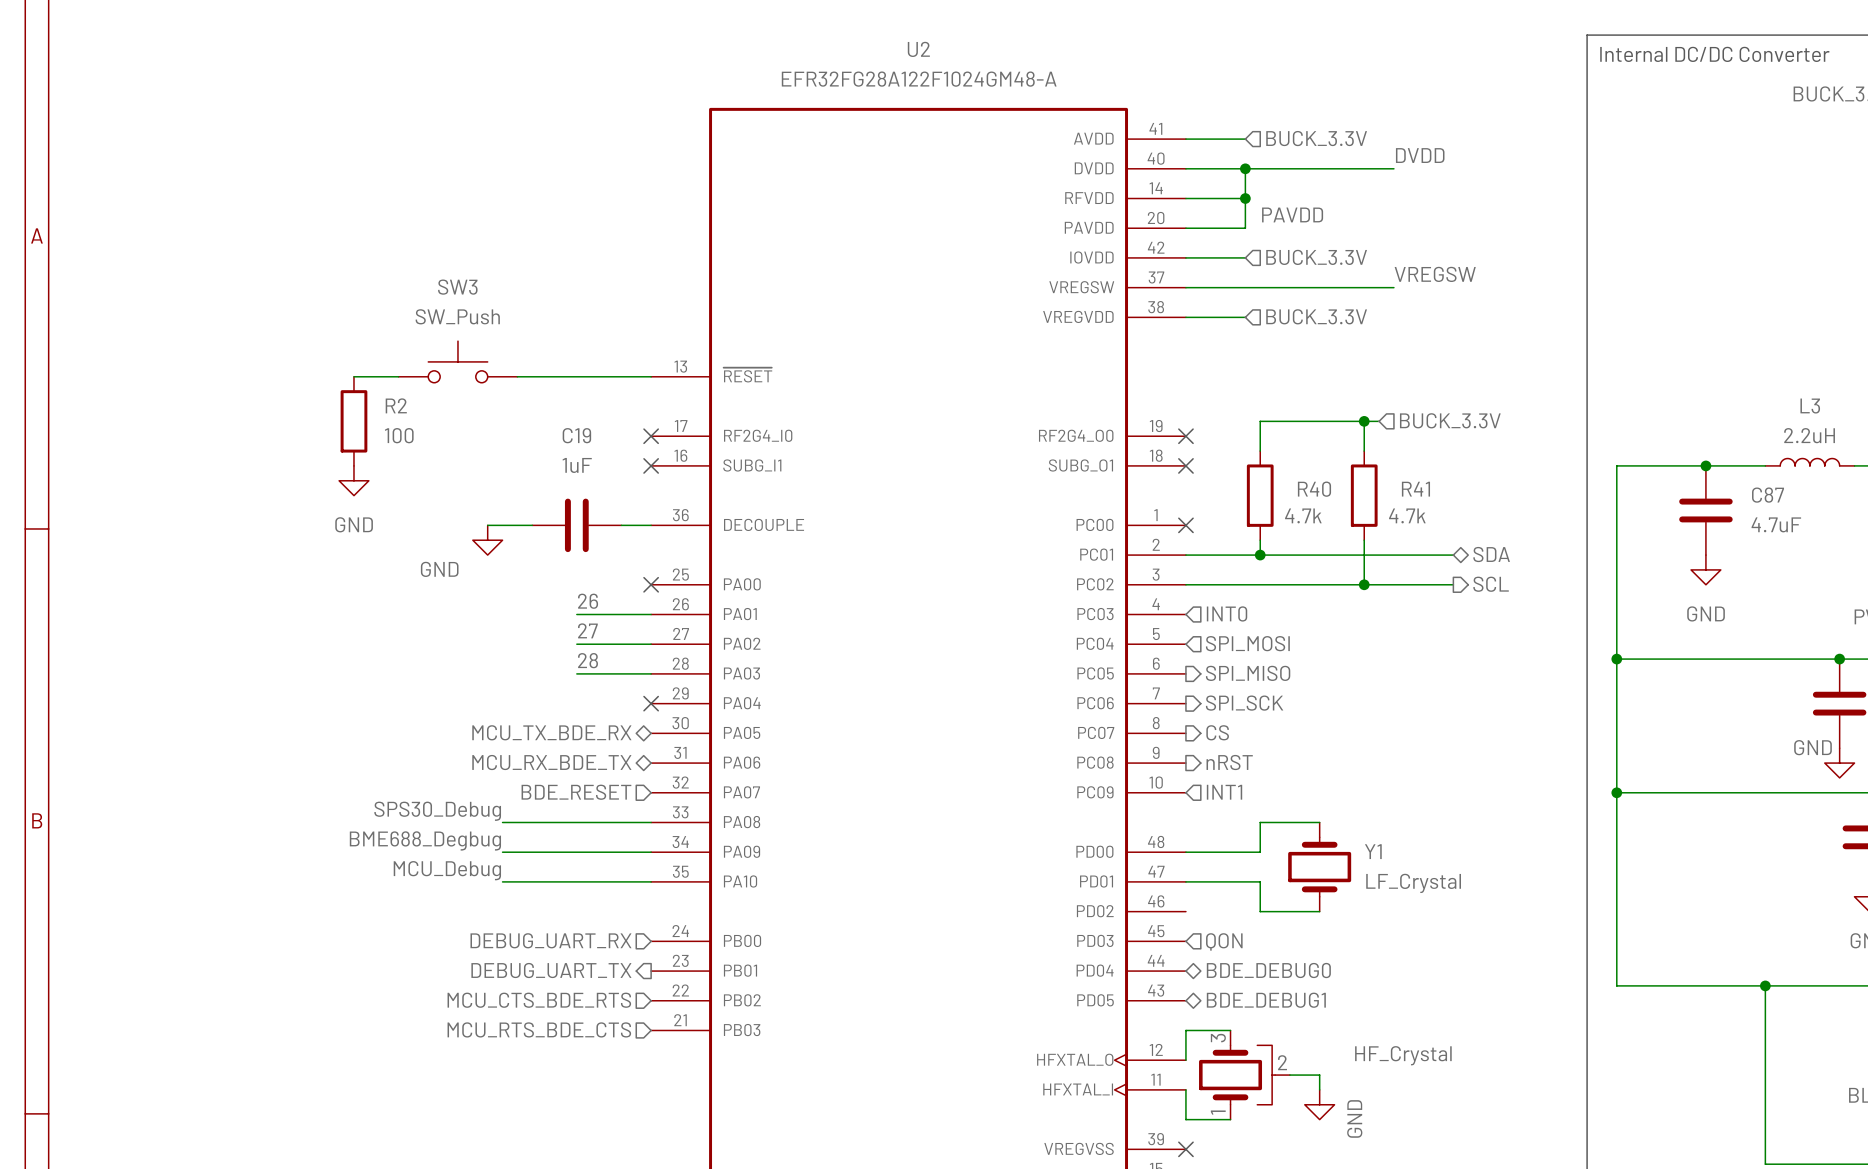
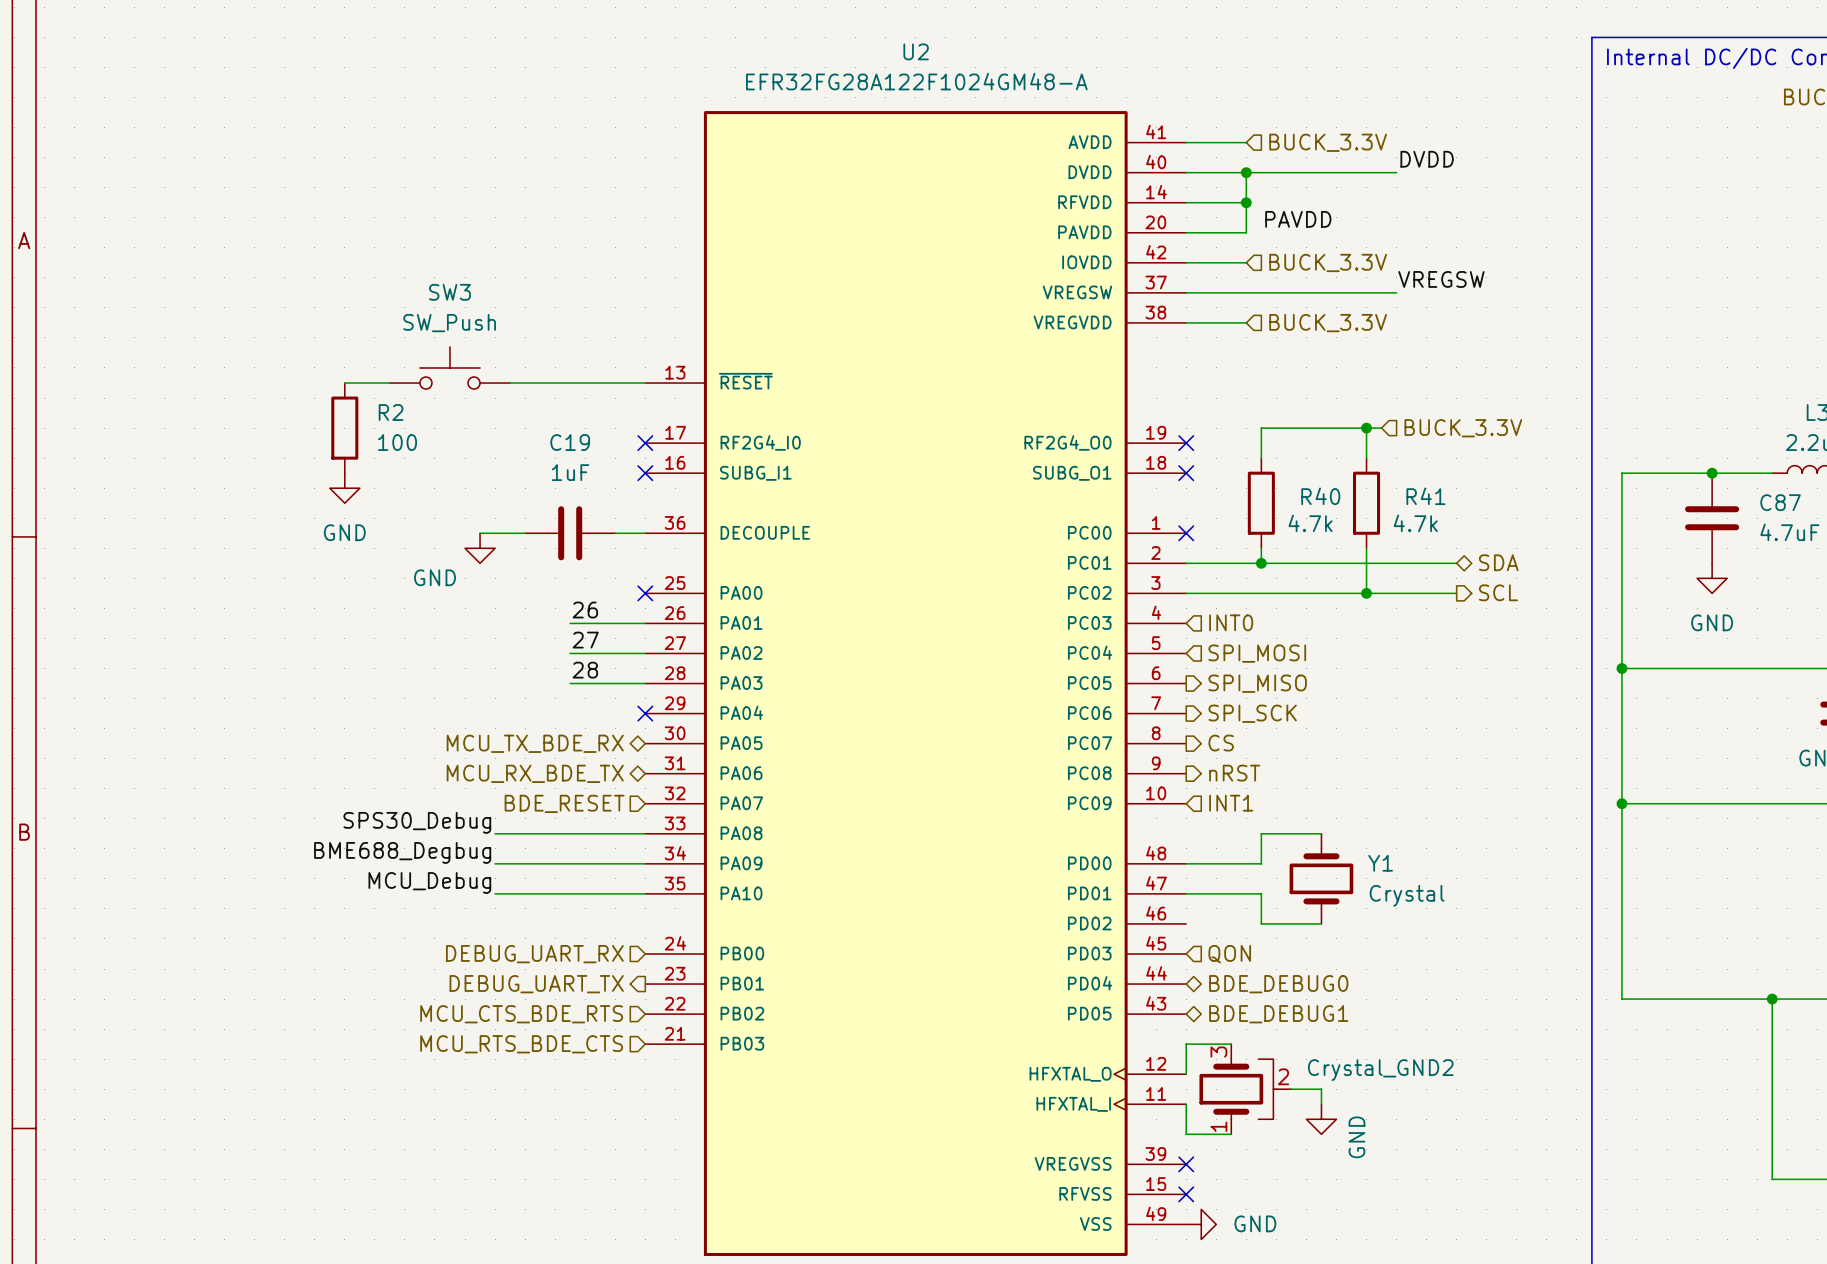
Y1 value: LF_Crystal (1413, 883) -> Crystal (1407, 895)
part value: HF_Crystal (1403, 1055) -> Crystal_GND2 (1380, 1070)

